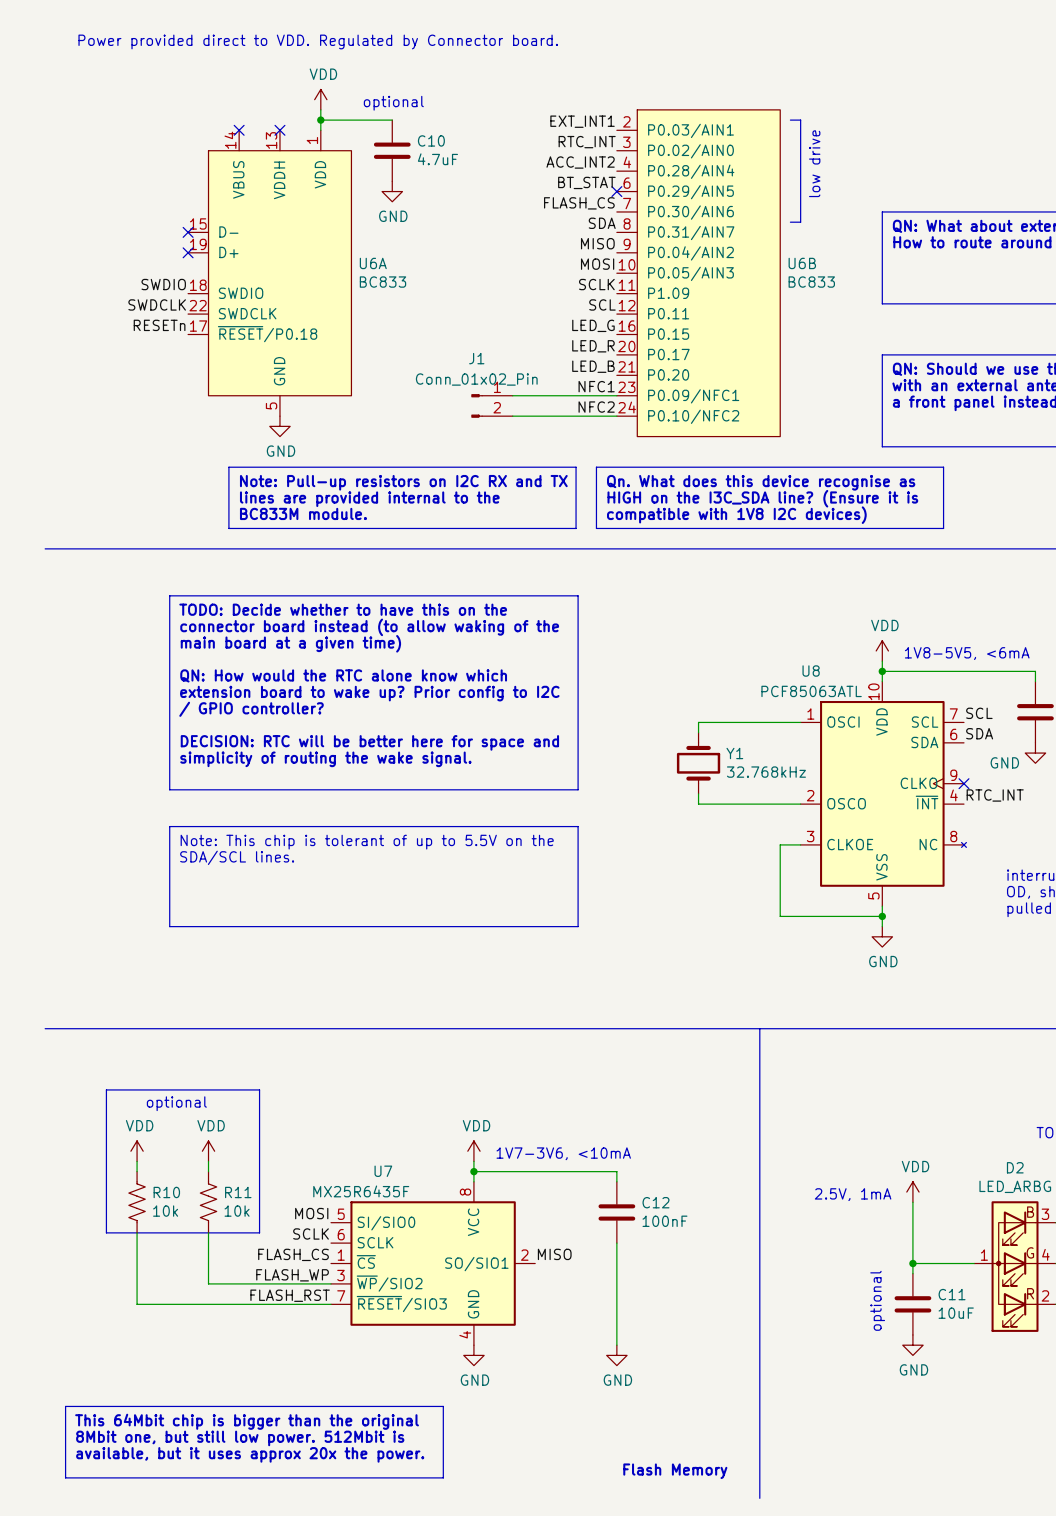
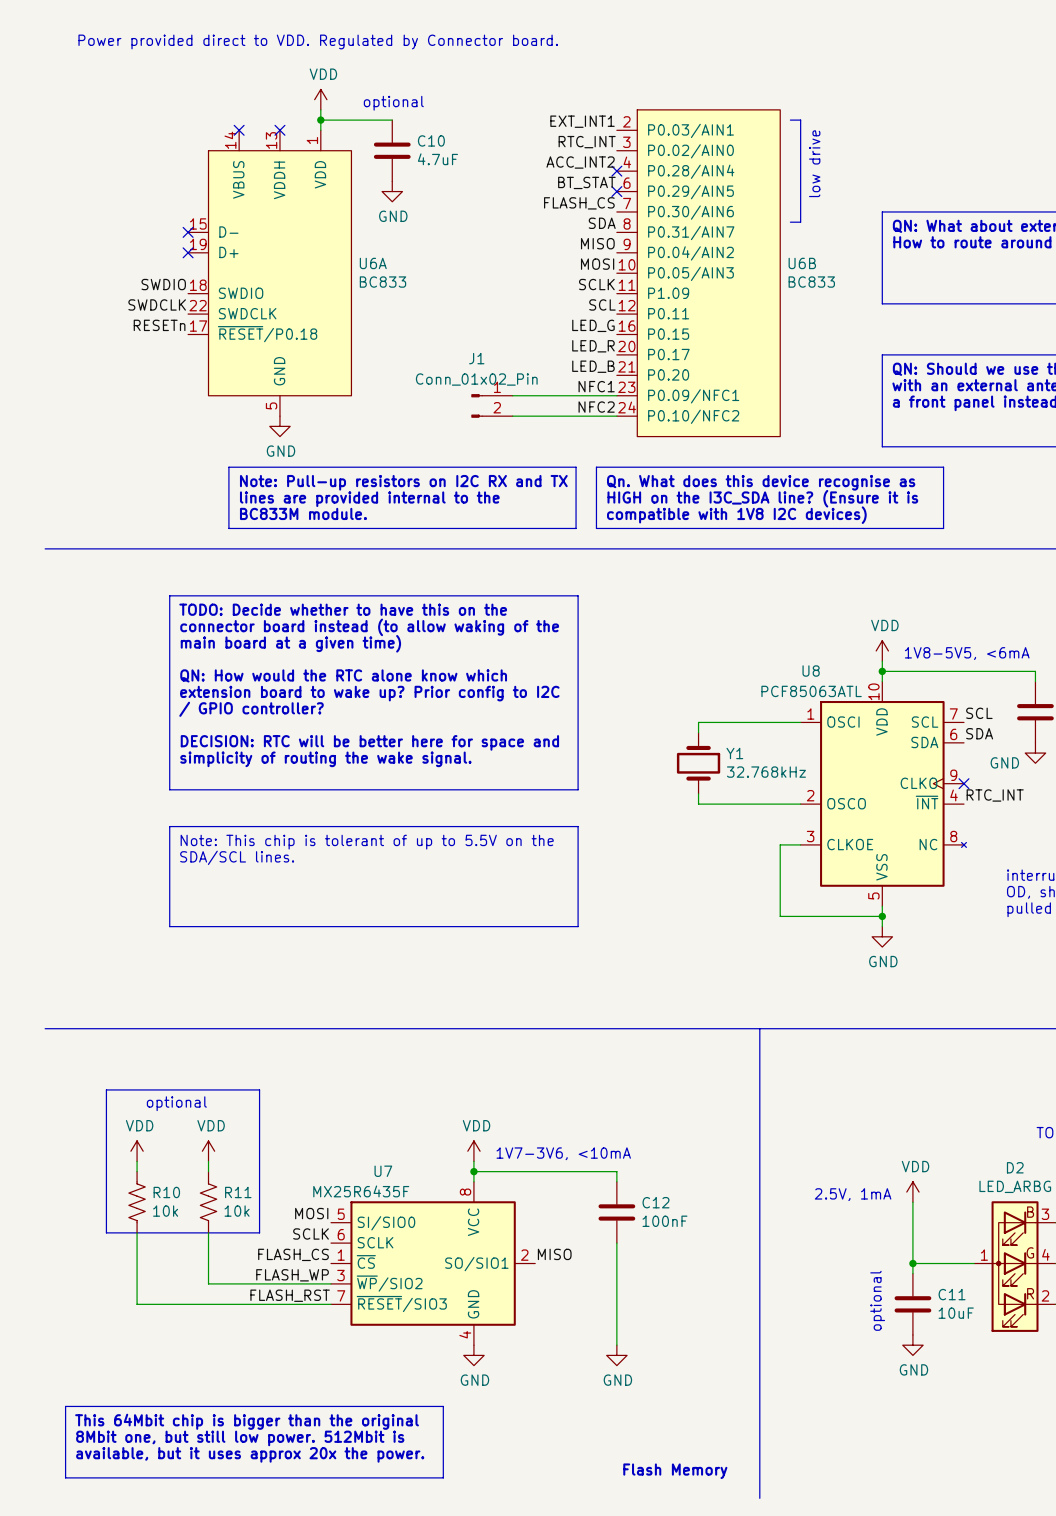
no-connect mark: none -> (616, 171)

